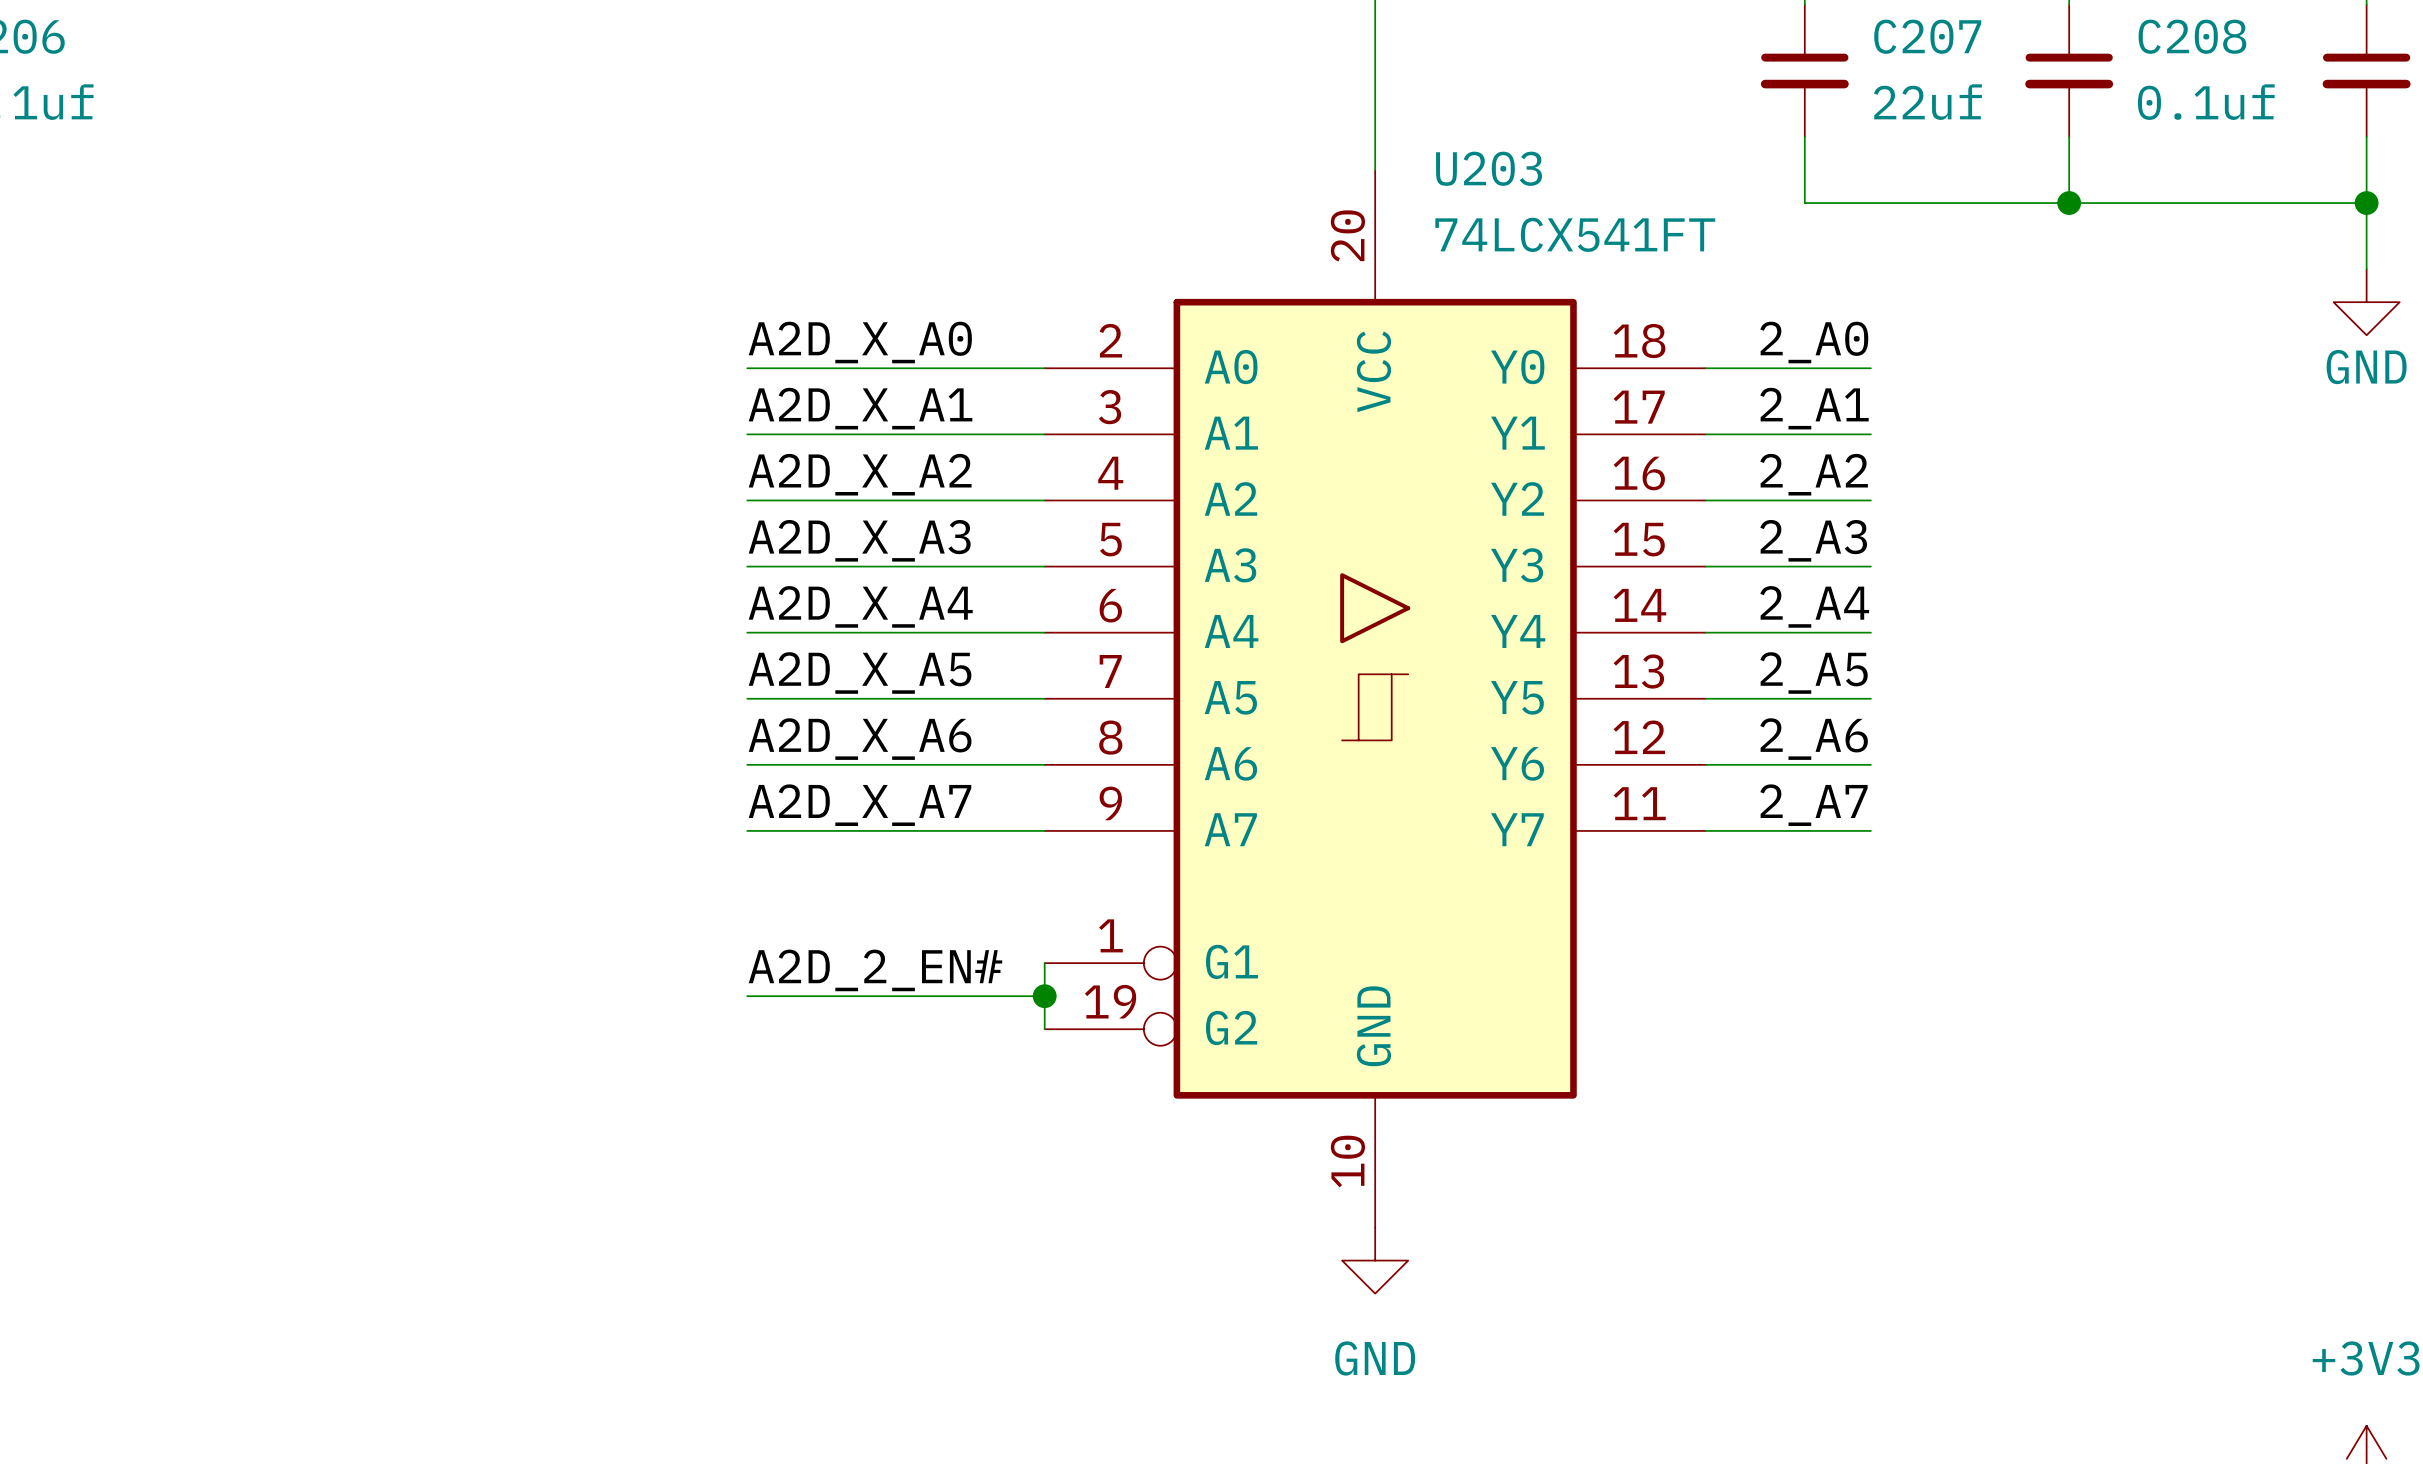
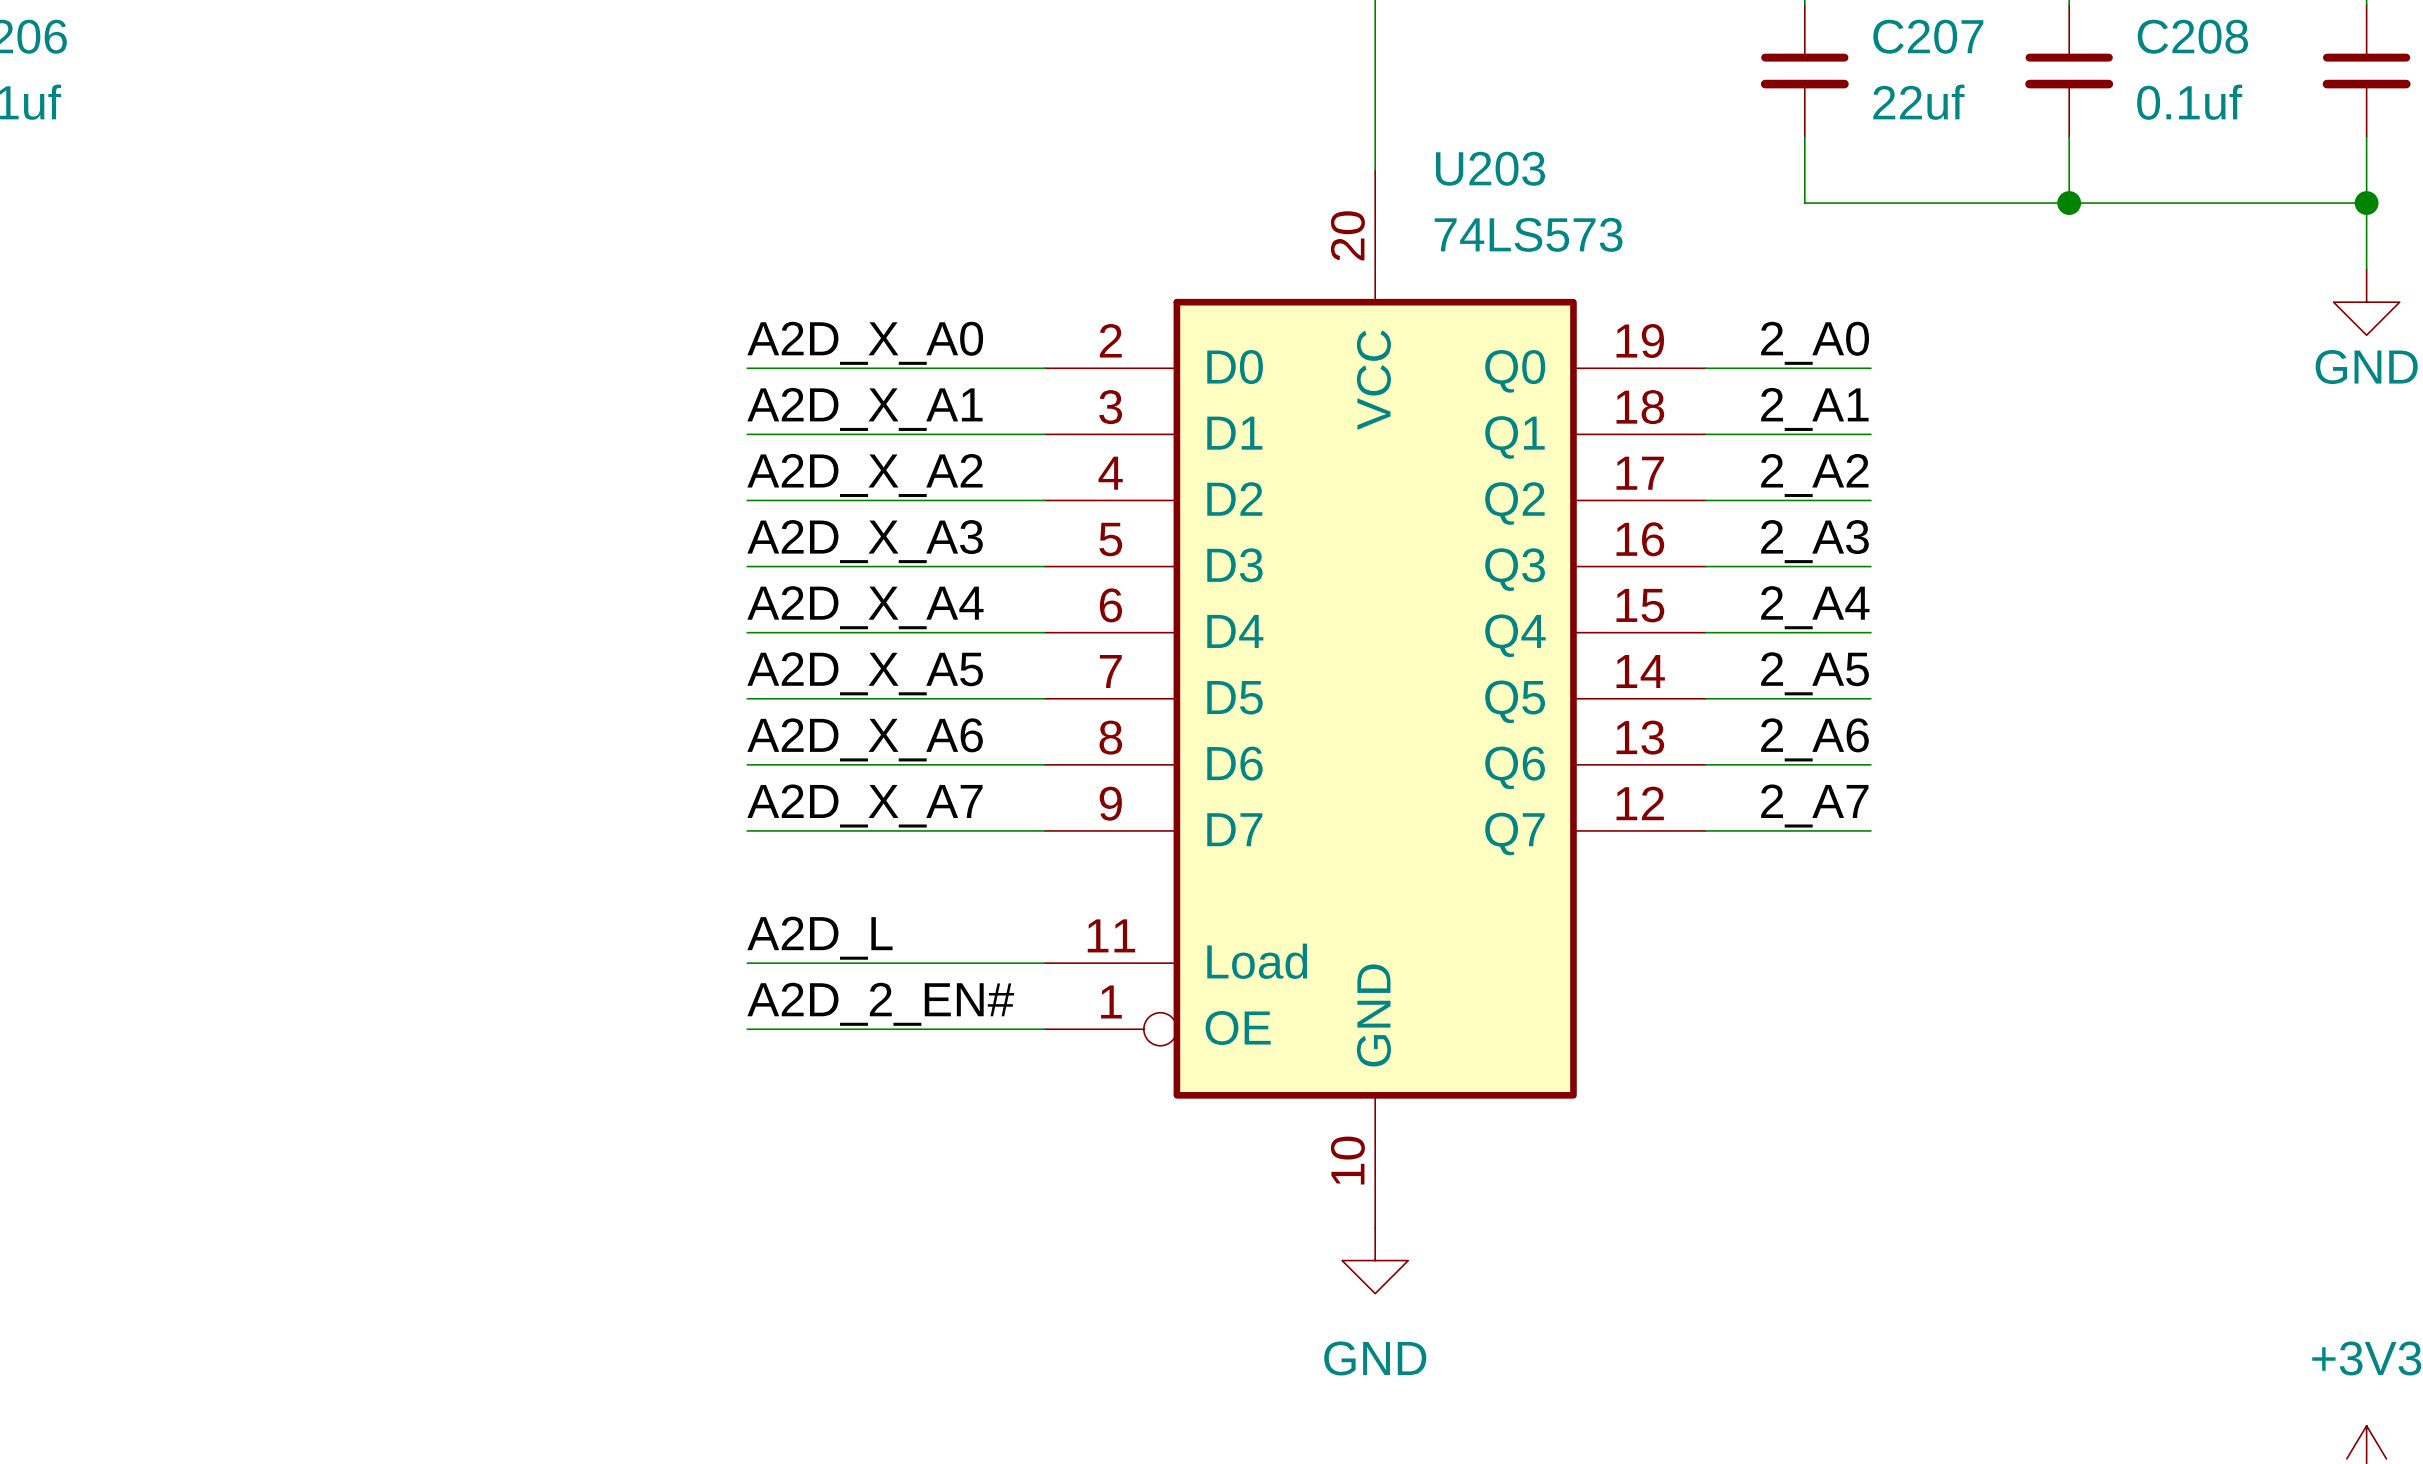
U203 symbol: [1044, 169, 1706, 1228] -> [1044, 169, 1706, 1228]
U203 value: 74LCX541FT (1575, 234) -> 74LS573 (1528, 234)
label: none -> A2D_L (819, 938)
wire: (1044, 963) (1044, 1029) -> (1044, 963) (747, 963)
label position: A2D_2_EN# (875, 970) -> A2D_2_EN# (880, 1004)
wire: (747, 996) (1044, 996) -> (747, 1029) (1044, 1029)
junction: (1044, 996) -> none

